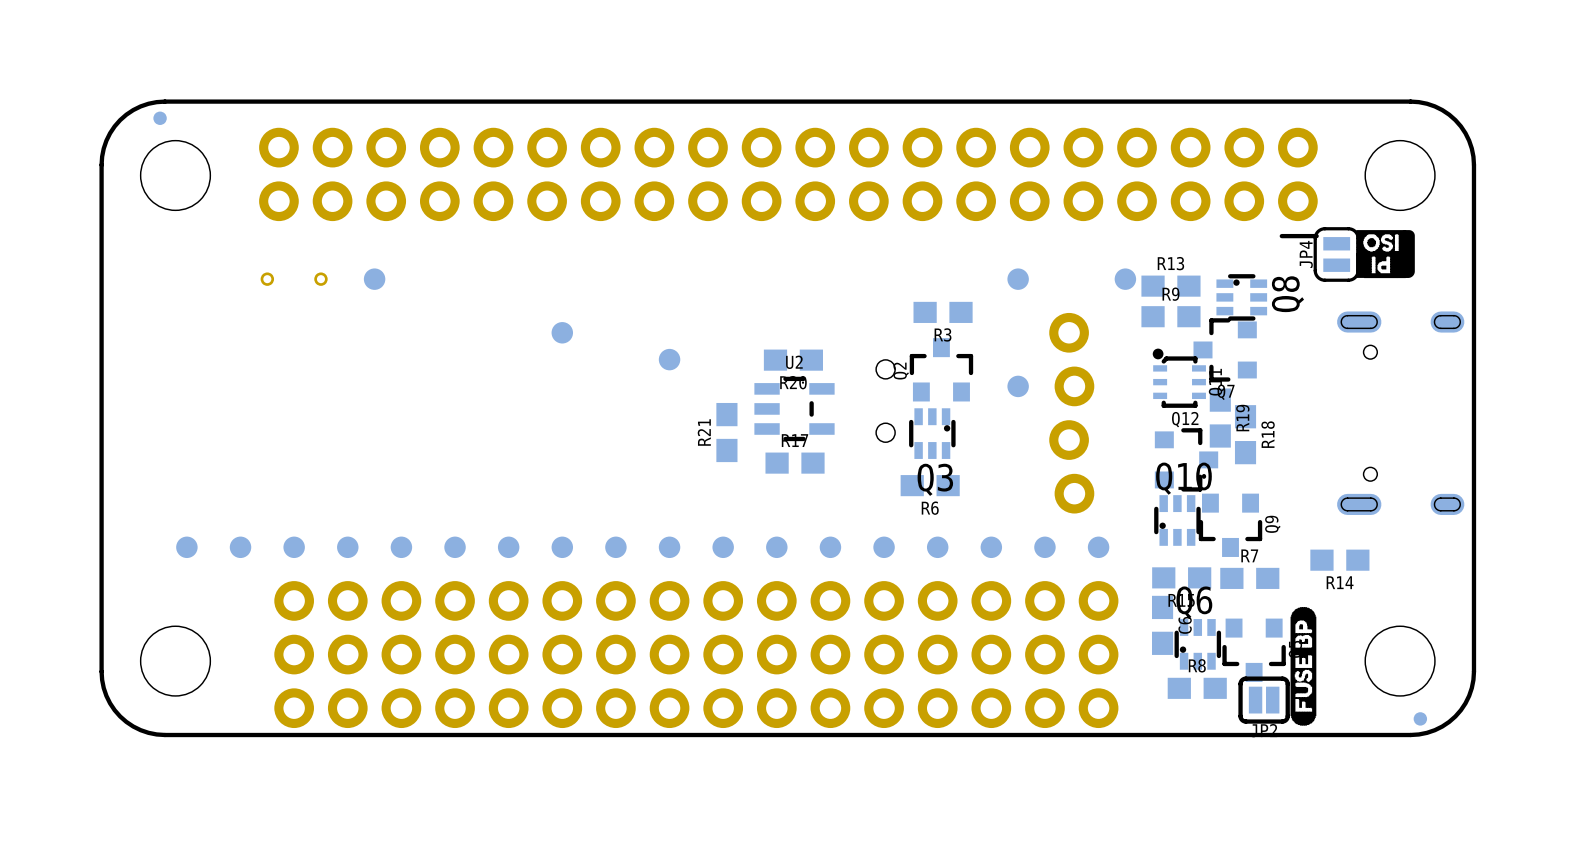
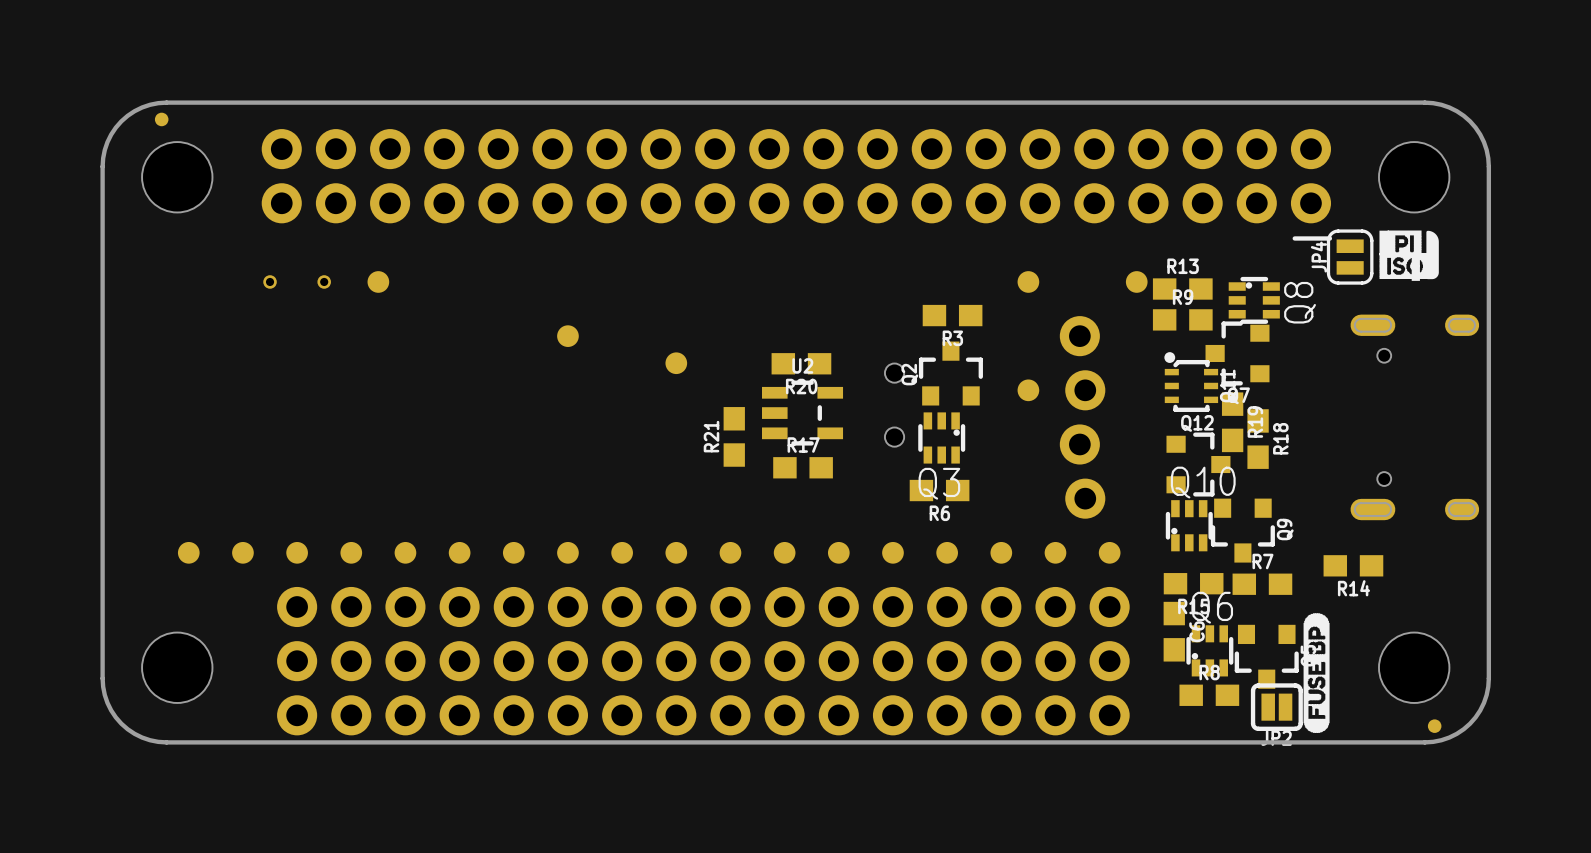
drawing shape: [1356, 230, 1407, 256] -> [1387, 230, 1422, 257]
drawing shape: [1402, 230, 1415, 278] -> [1426, 230, 1439, 280]
drawing: none -> [1379, 252, 1431, 280]
drawing: [1364, 252, 1398, 279] -> none
drawing position: (1360, 265) -> (1384, 242)

